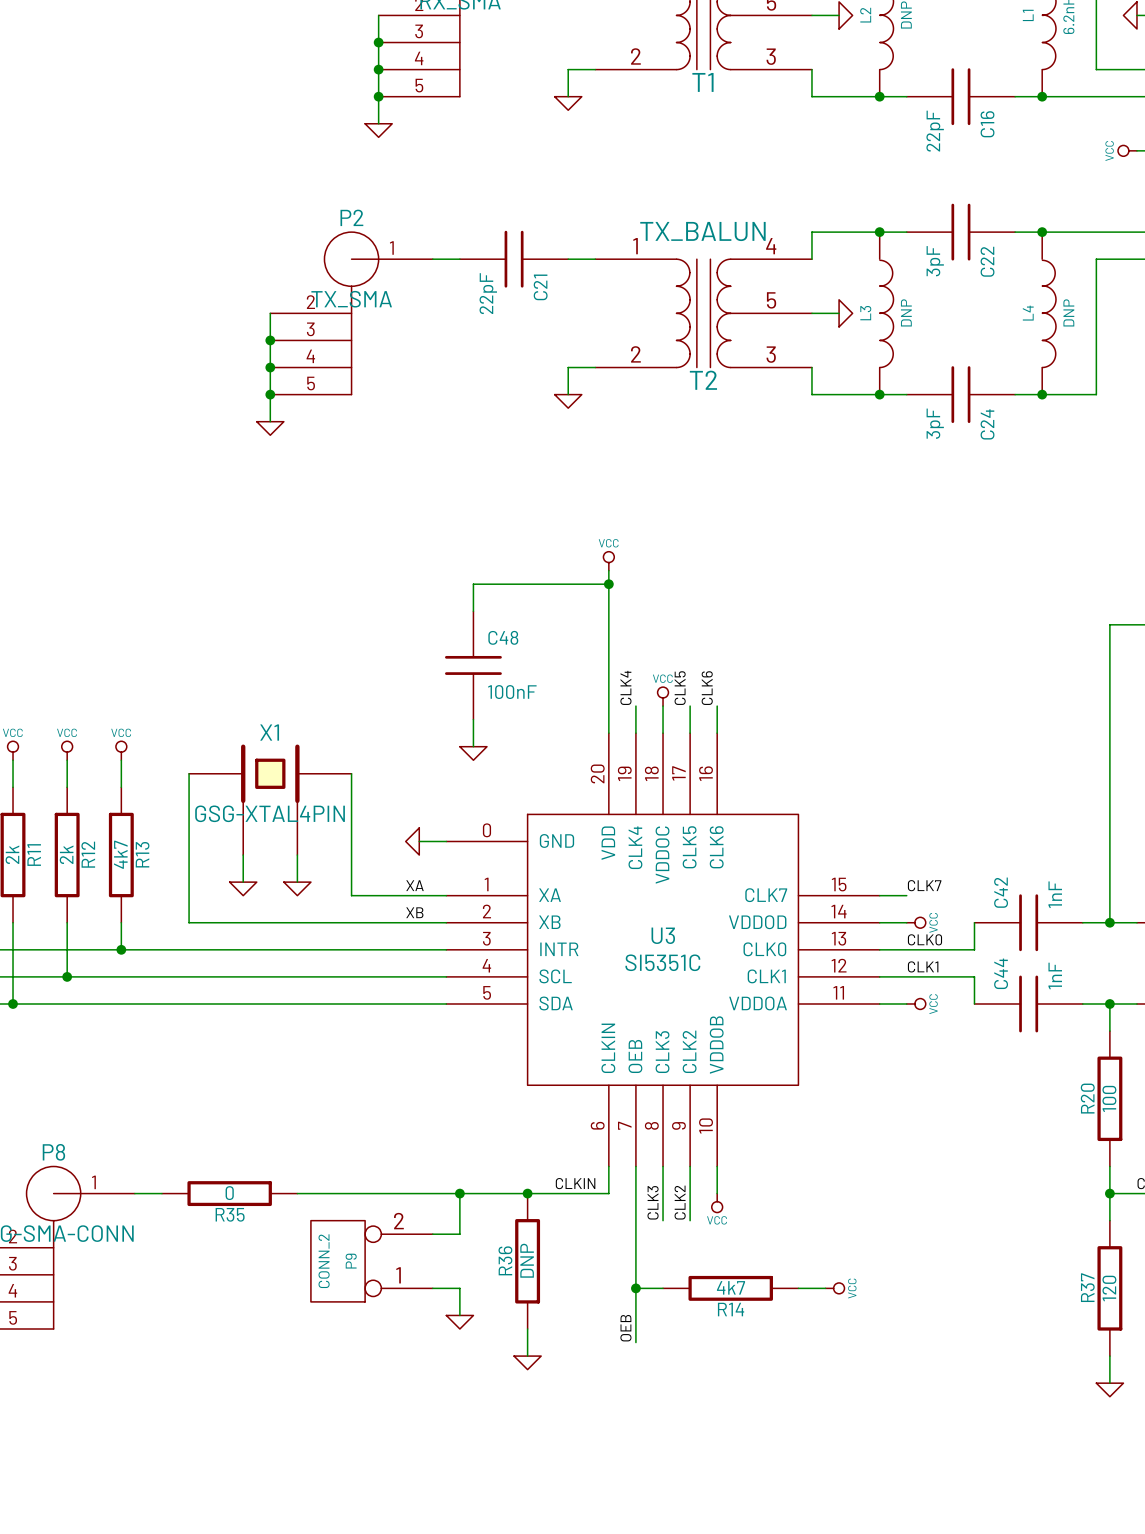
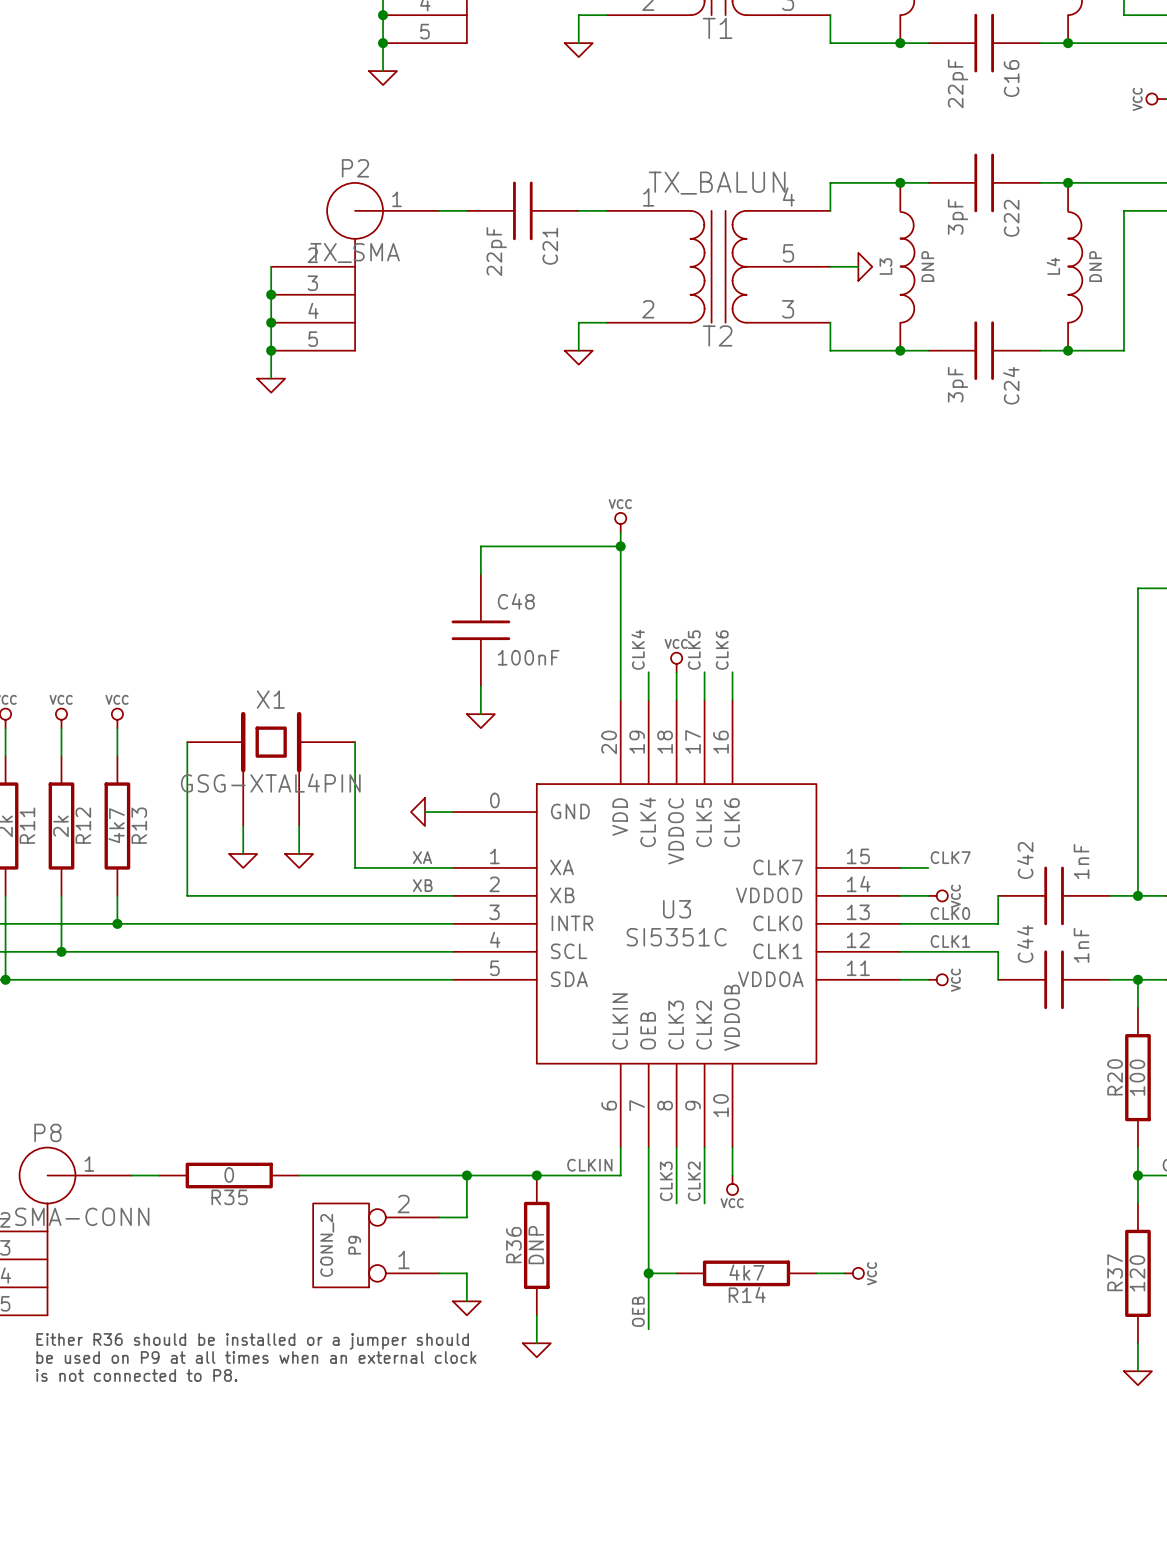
text: none -> Either R36 should be installed or a jumper should (252, 1341)
text: none -> be used on P9 at all times when an external clock (256, 1357)
text: none -> is not connected to P8. (136, 1375)

